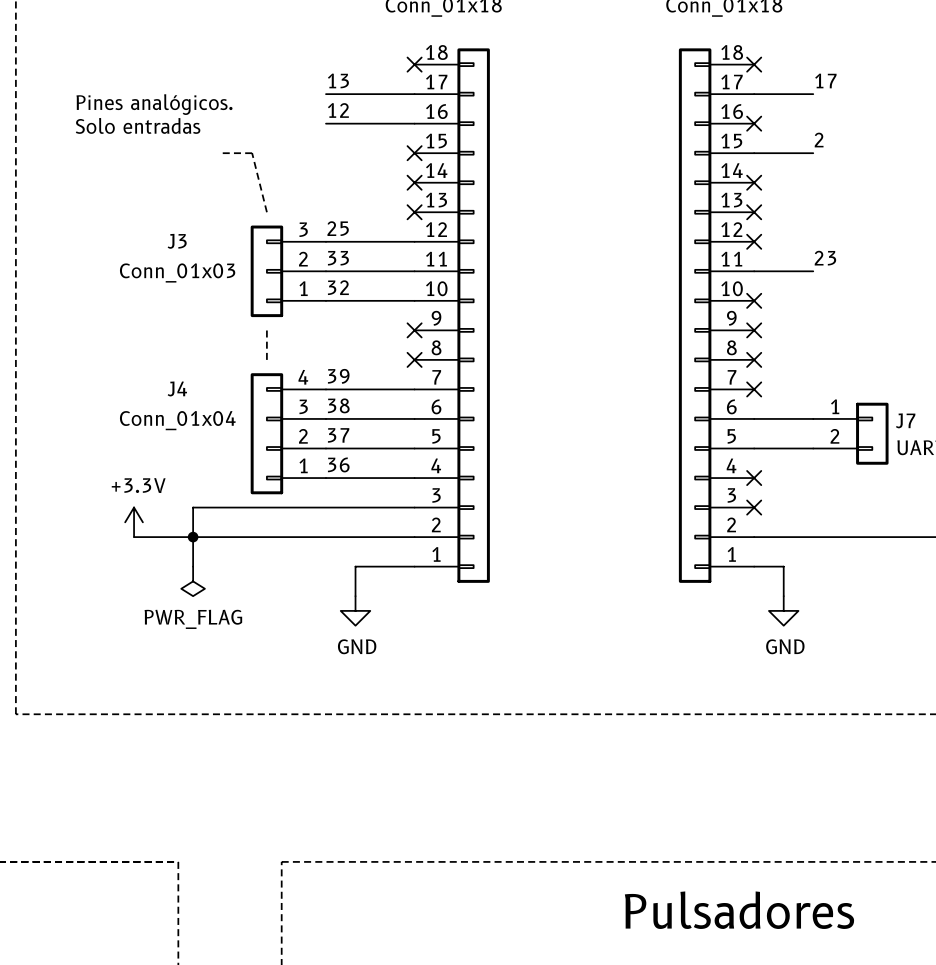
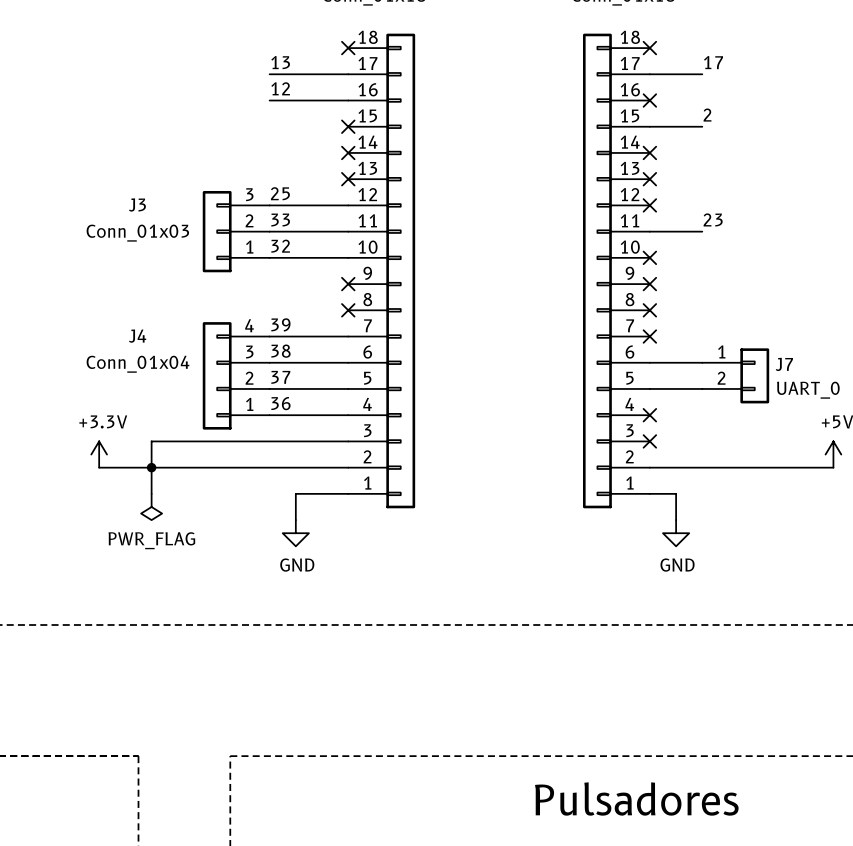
text: Pines analógicos. (154, 104) -> none
text: Solo entradas (138, 125) -> none
line: (222, 153) (252, 153) (266, 212) -> none
line: (266, 330) (266, 359) -> none

